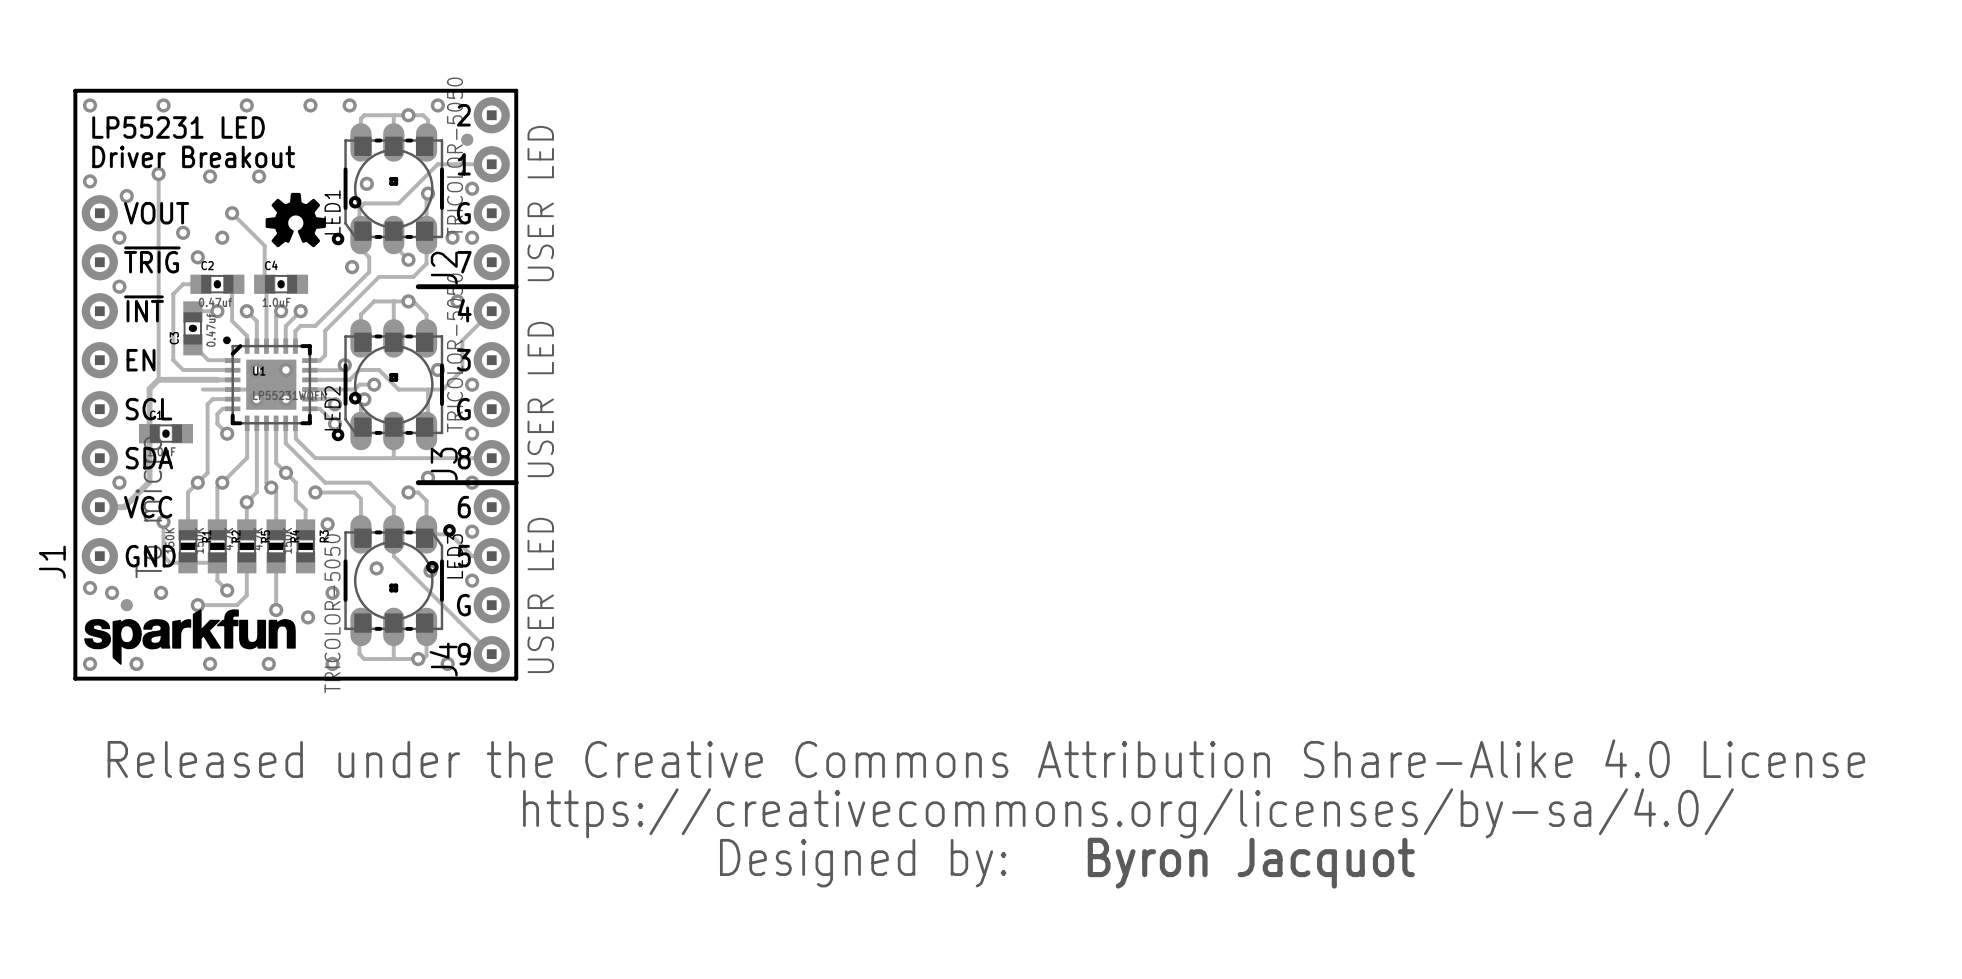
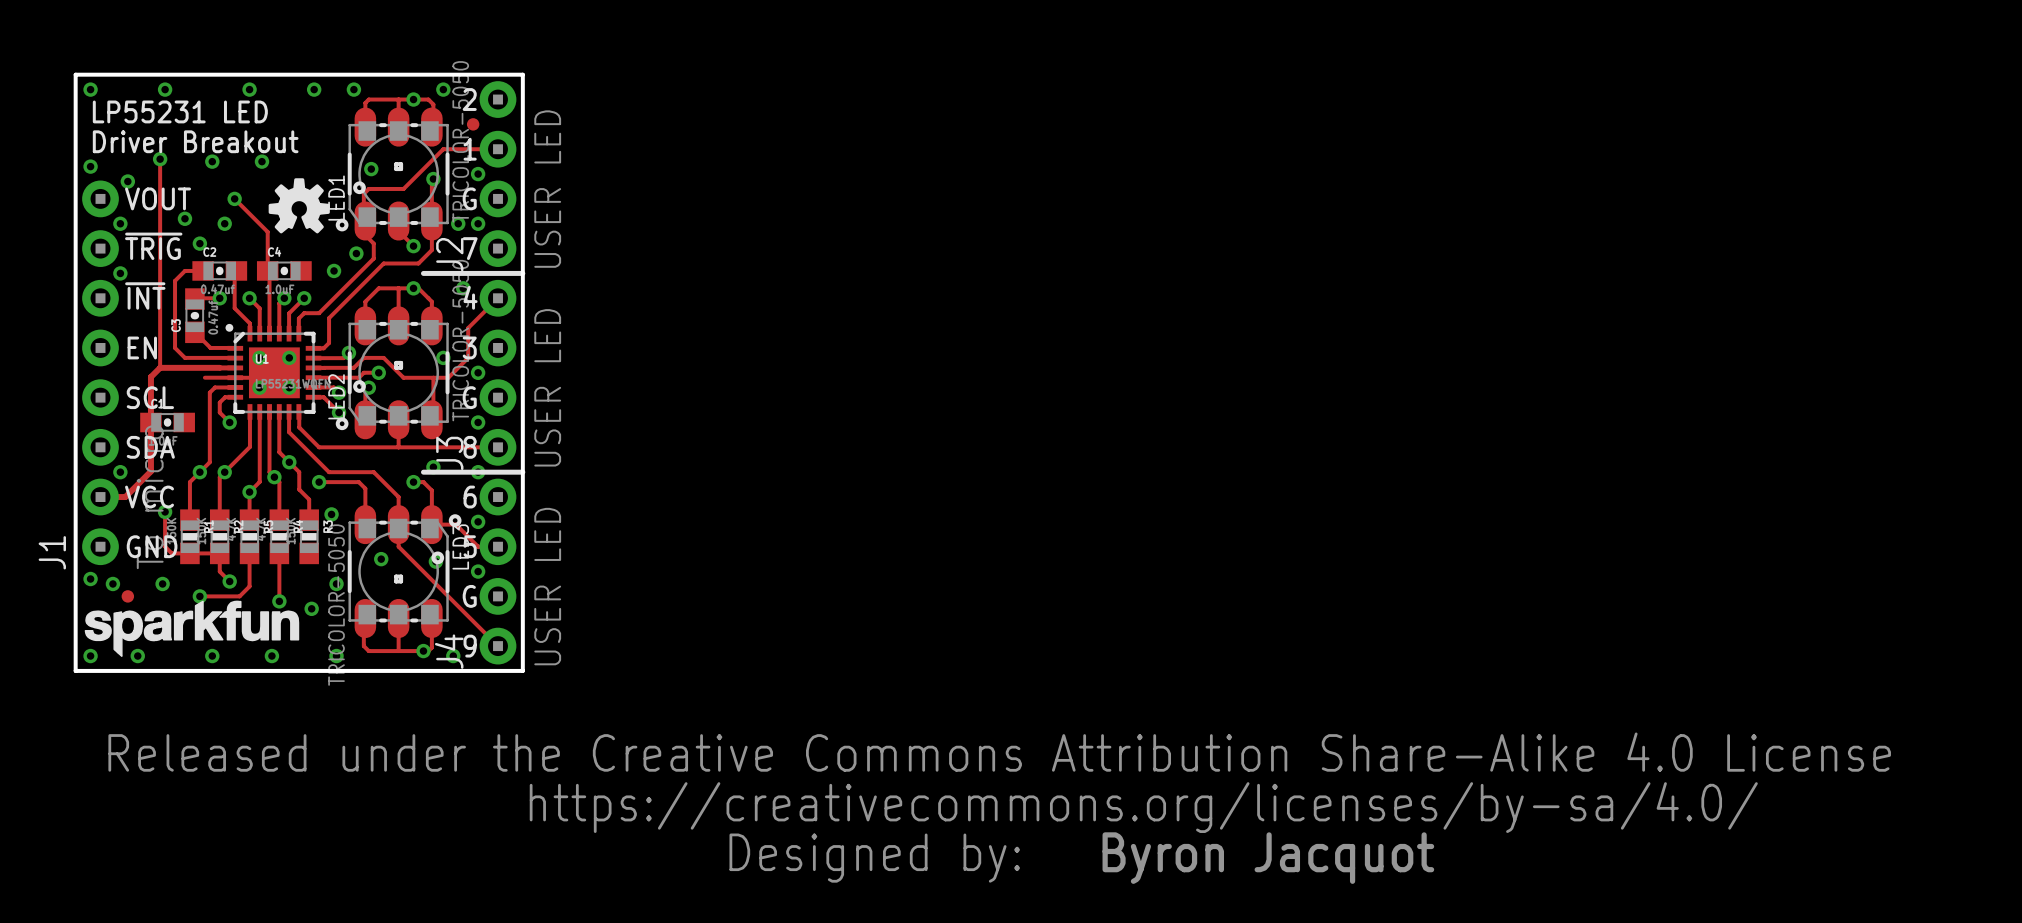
via: none -> (334, 270)

